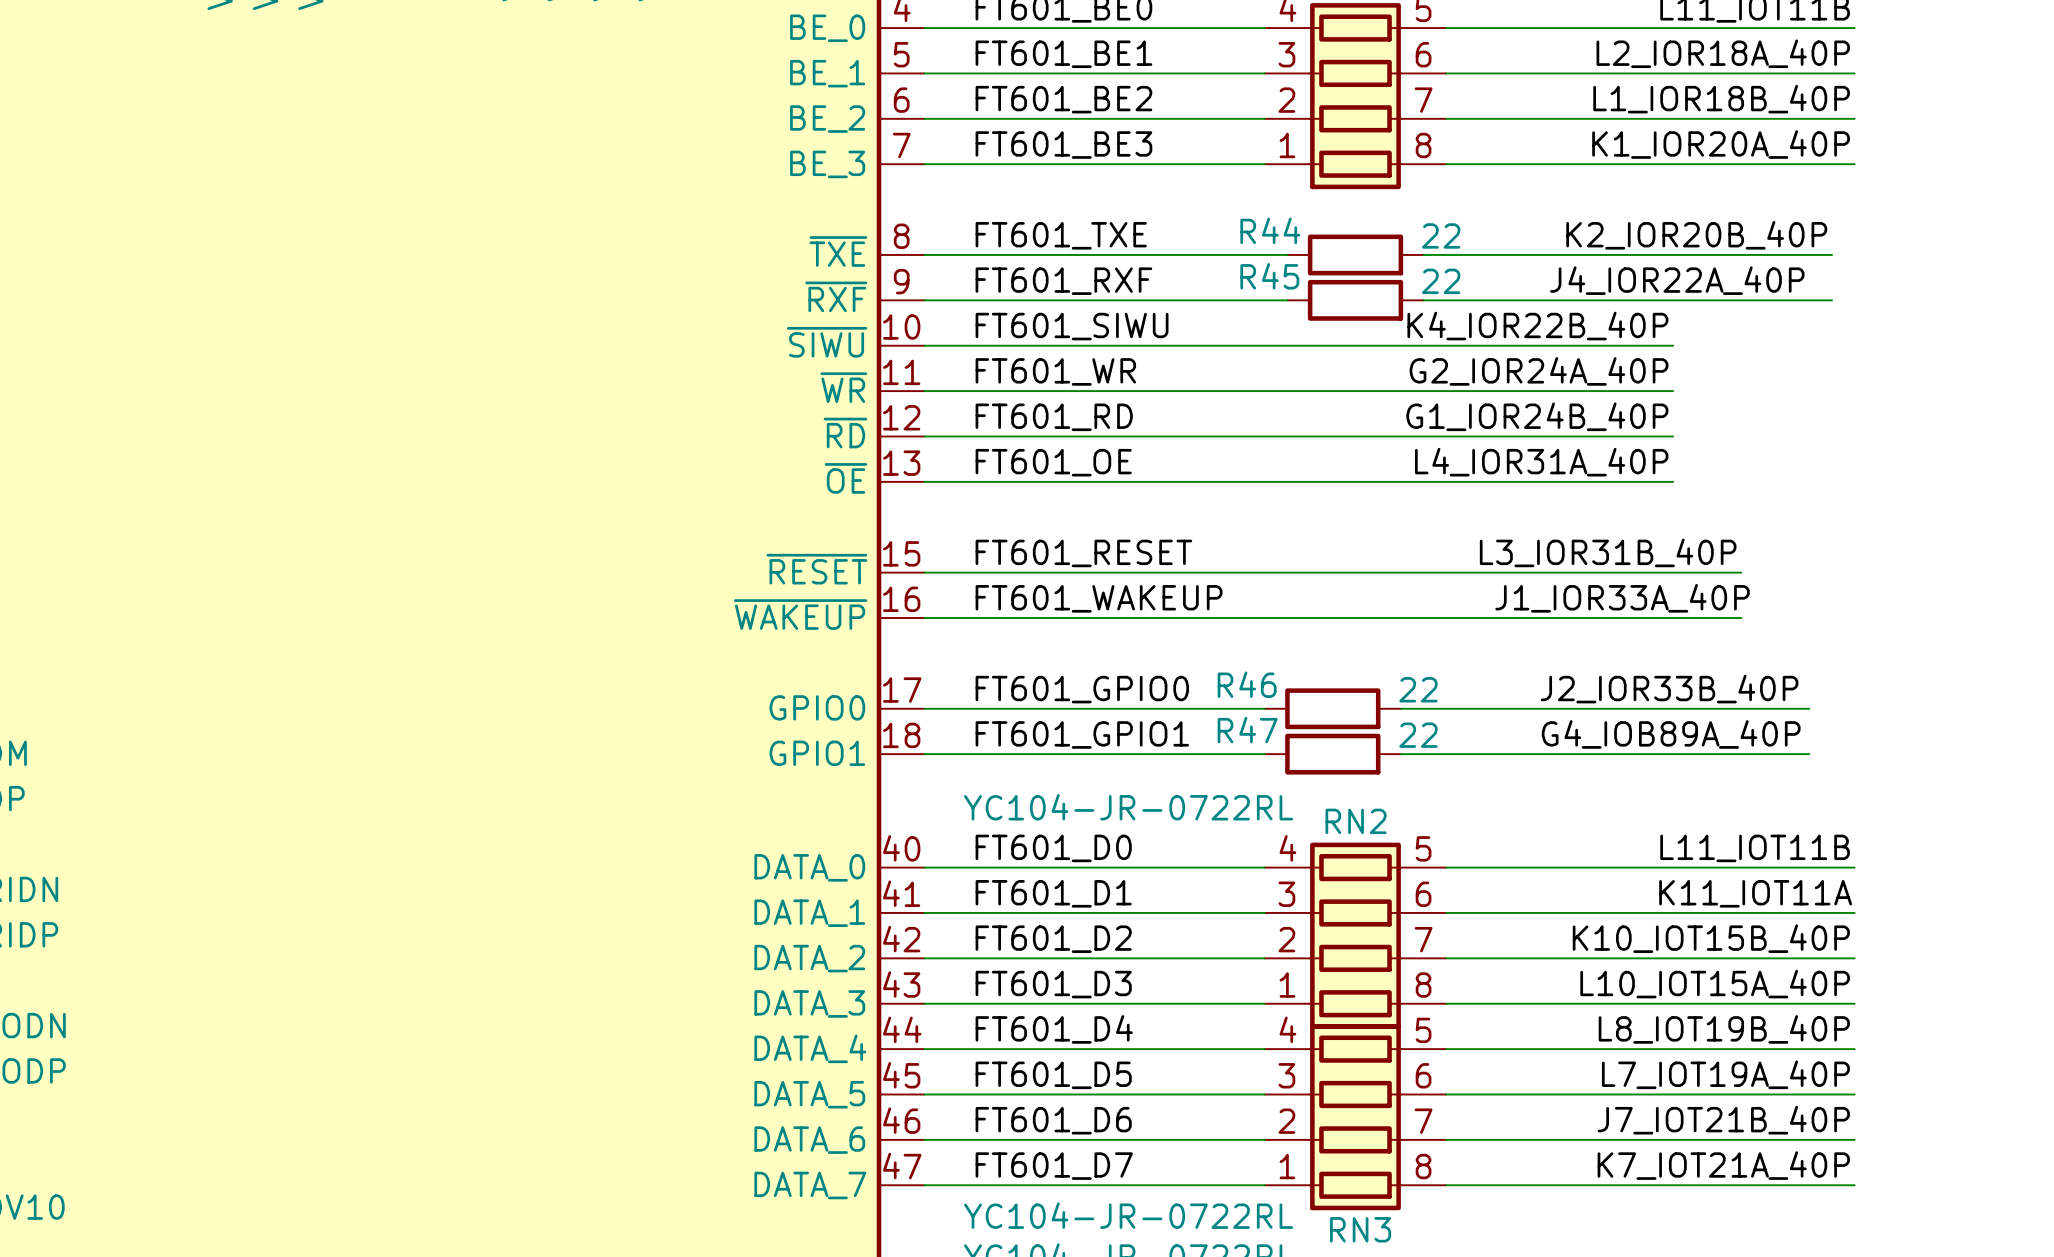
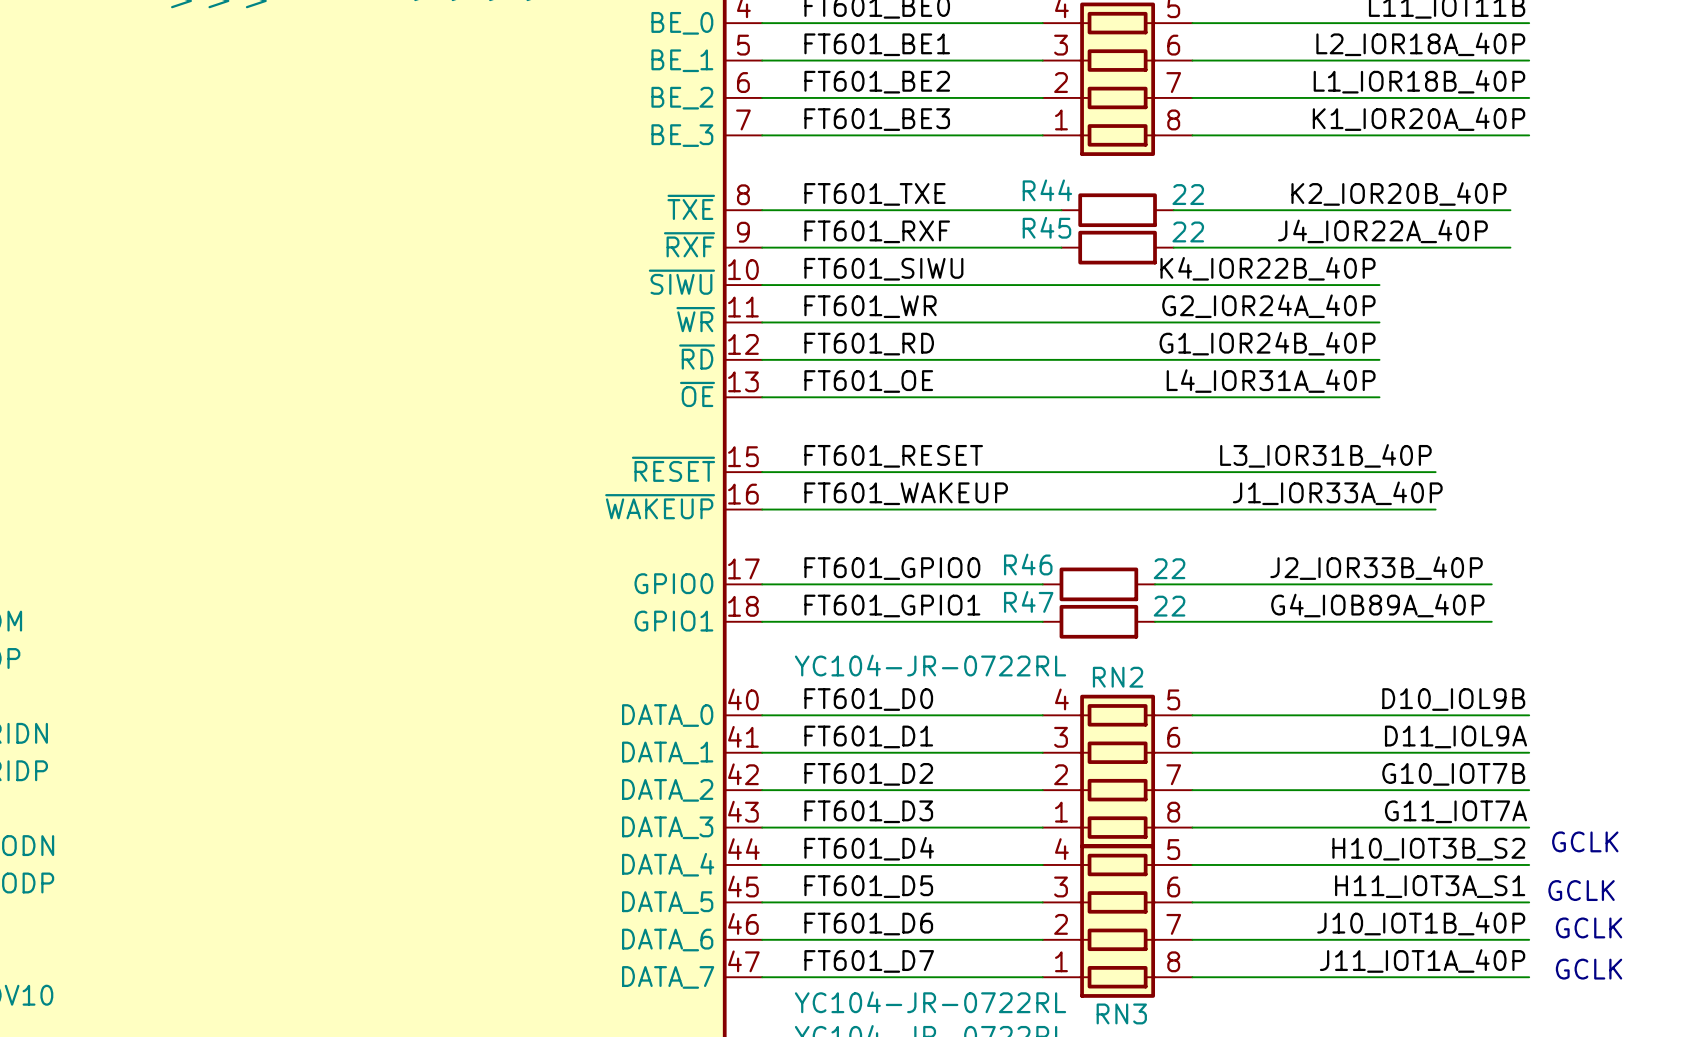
label: L11_IOT11B (1755, 848) -> D10_IOL9B (1453, 699)
label: K11_IOT11A (1755, 893) -> D11_IOL9A (1455, 736)
label: K10_IOT15B_40P (1711, 938) -> G10_IOT7B (1453, 774)
label: L10_IOT15A_40P (1715, 984) -> G11_IOT7A (1455, 811)
text: none -> GCLK (1585, 841)
label: L8_IOT19B_40P (1724, 1029) -> H10_IOT3B_S2 (1428, 849)
label: L7_IOT19A_40P (1725, 1074) -> H11_IOT3A_S1 (1430, 886)
text: none -> GCLK (1581, 890)
label: J7_IOT21B_40P (1723, 1120) -> J10_IOT1B_40P (1421, 923)
text: none -> GCLK (1589, 927)
label: K7_IOT21A_40P (1723, 1165) -> J11_IOT1A_40P (1422, 960)
text: none -> GCLK (1589, 969)

